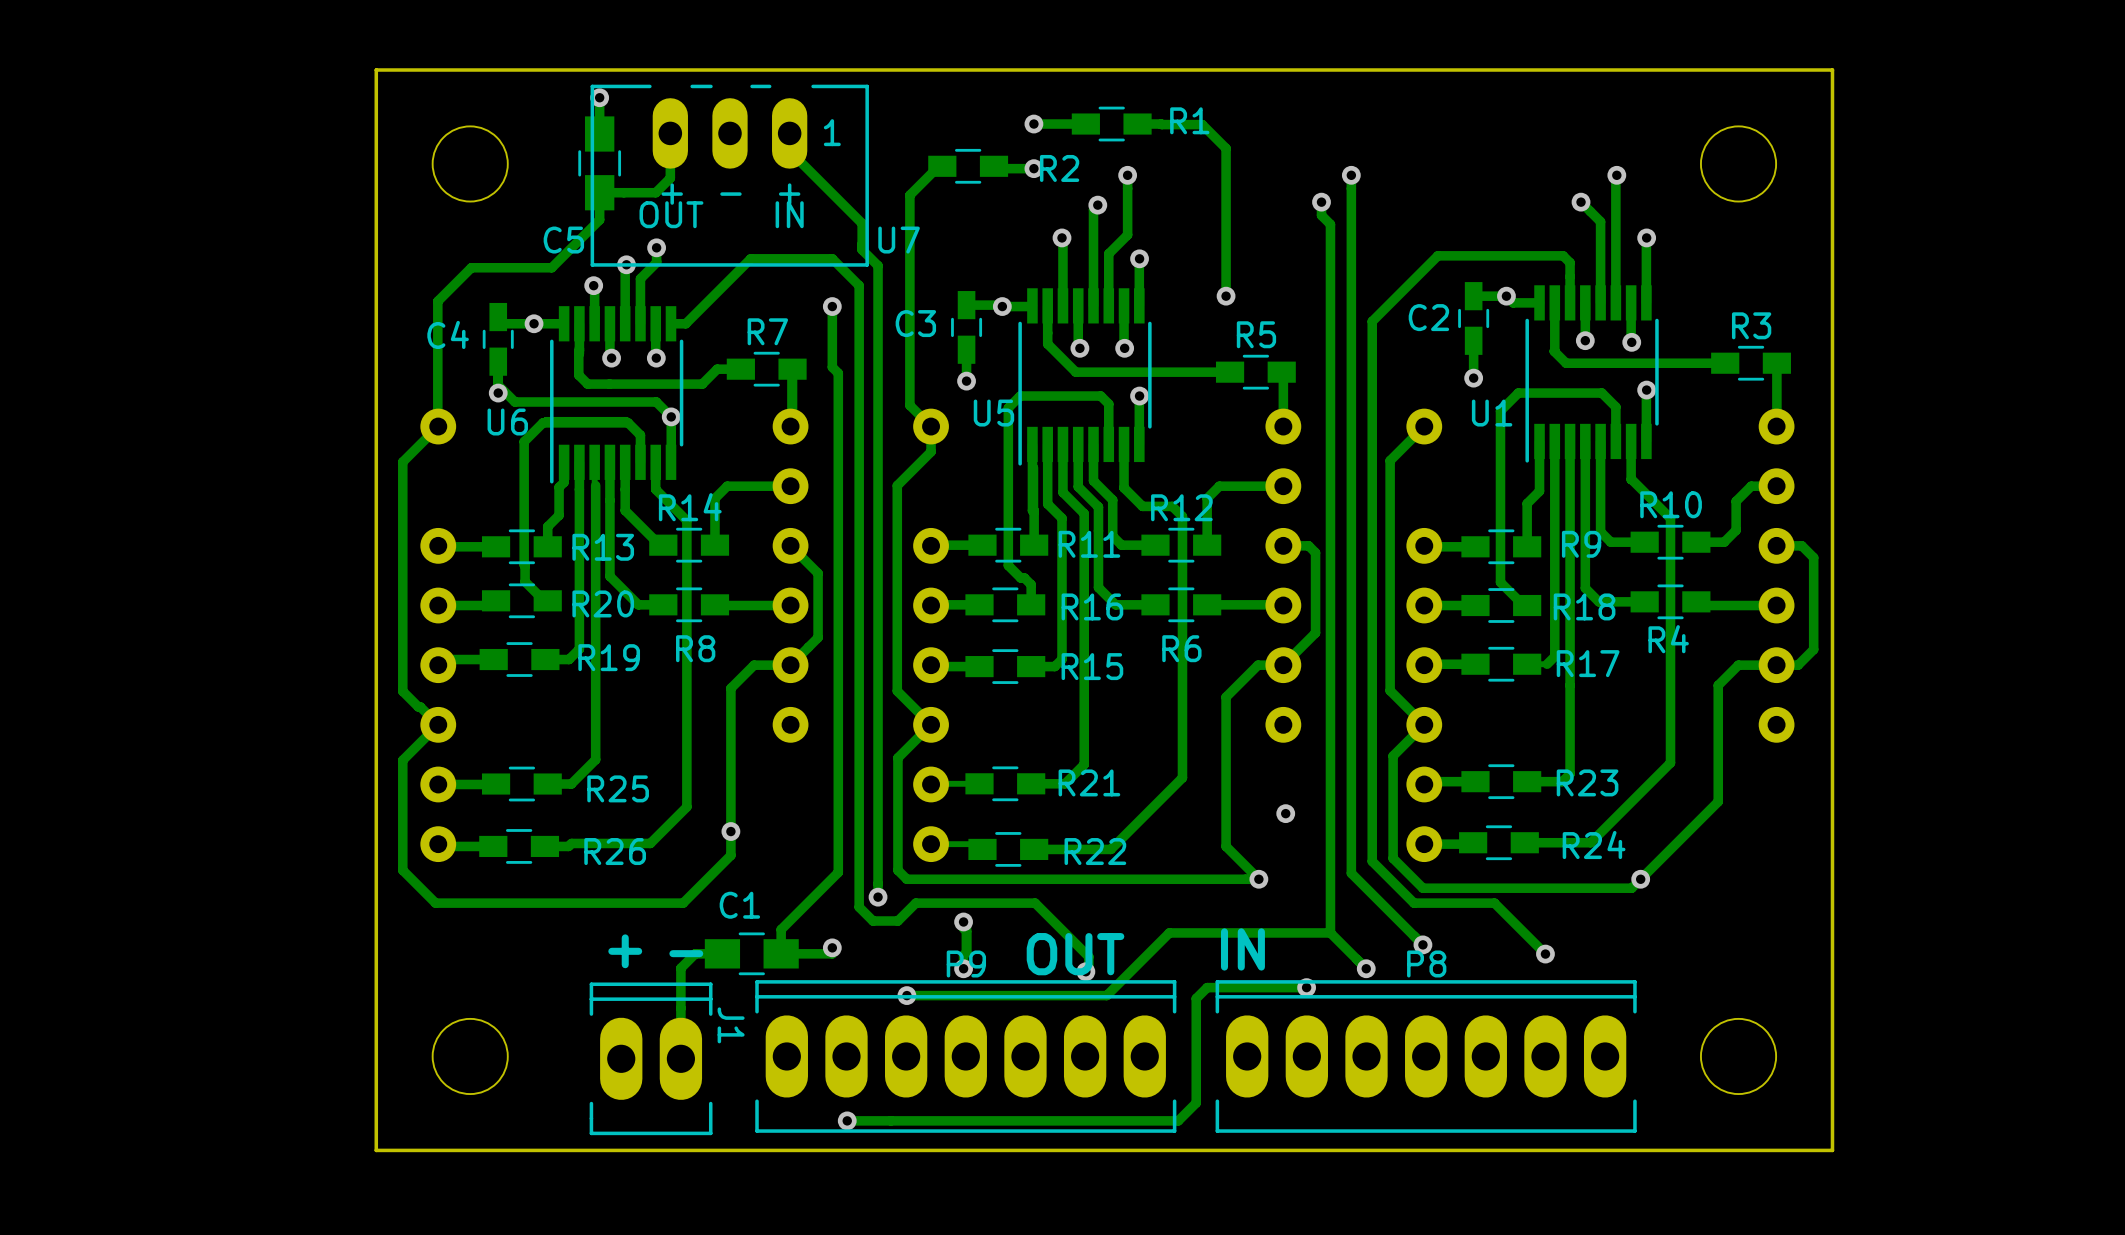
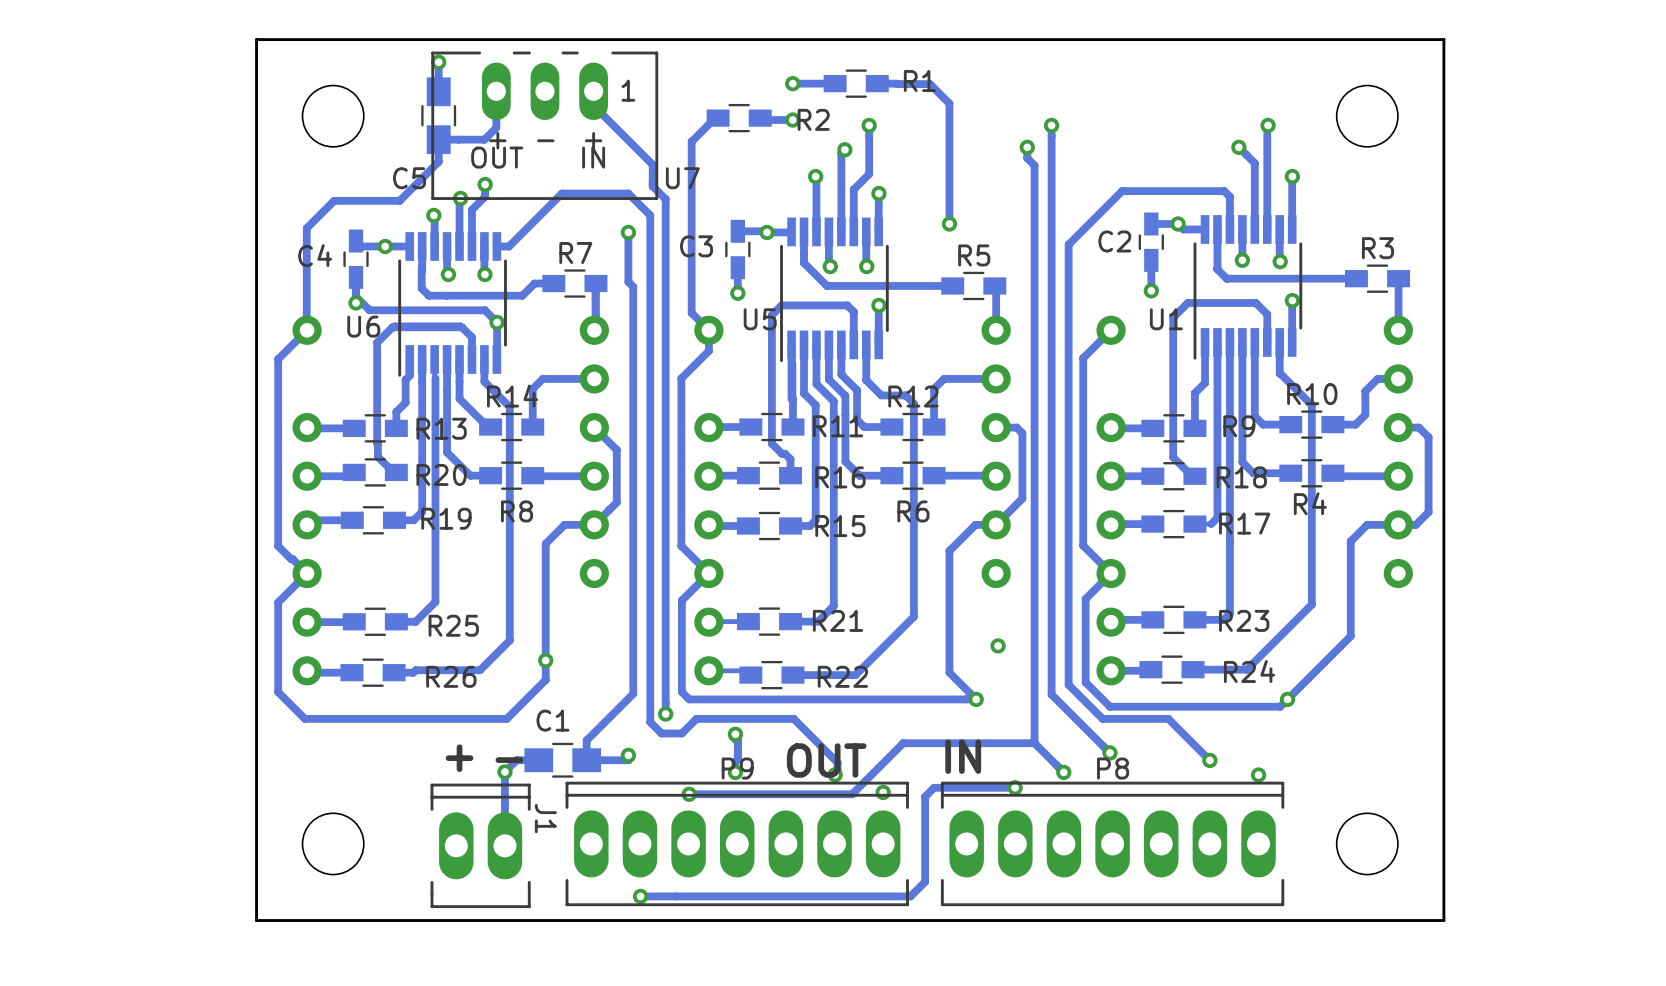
via: none -> (504, 771)
via: none -> (1258, 775)
via: none -> (883, 792)

